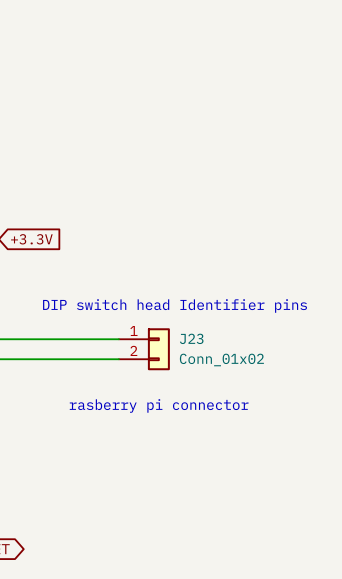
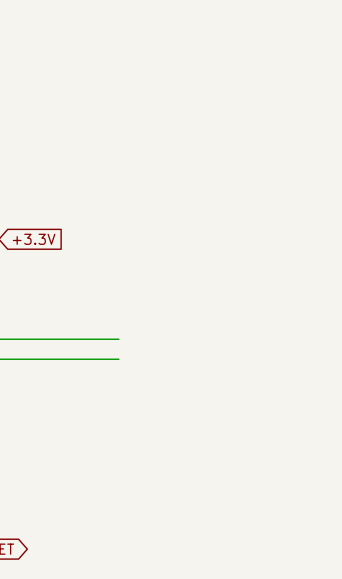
text: DIP switch head Identifier pins (175, 306) -> none
J23: Conn_01x02 (144, 349) -> none
text: rasberry pi connector (159, 405) -> none

